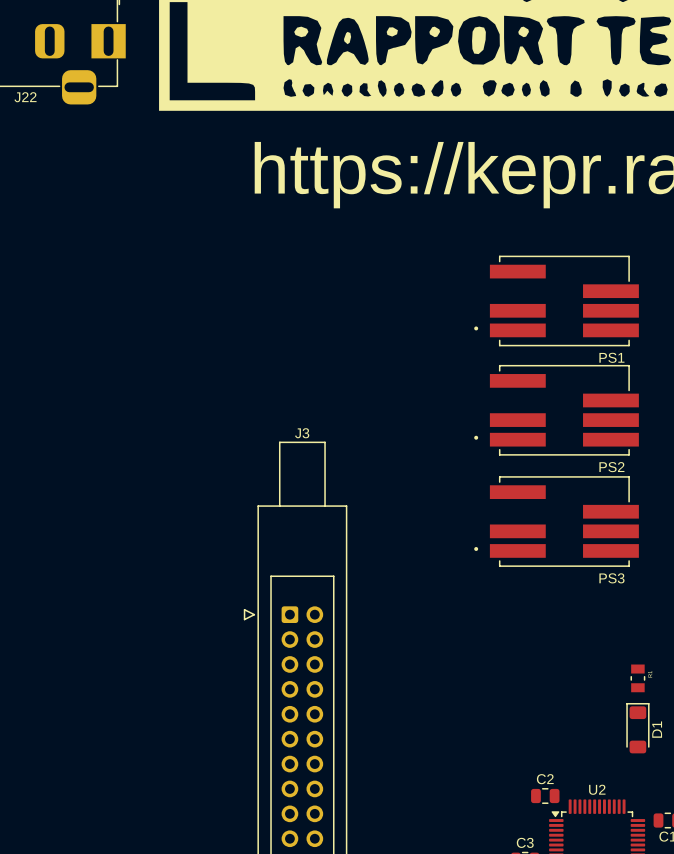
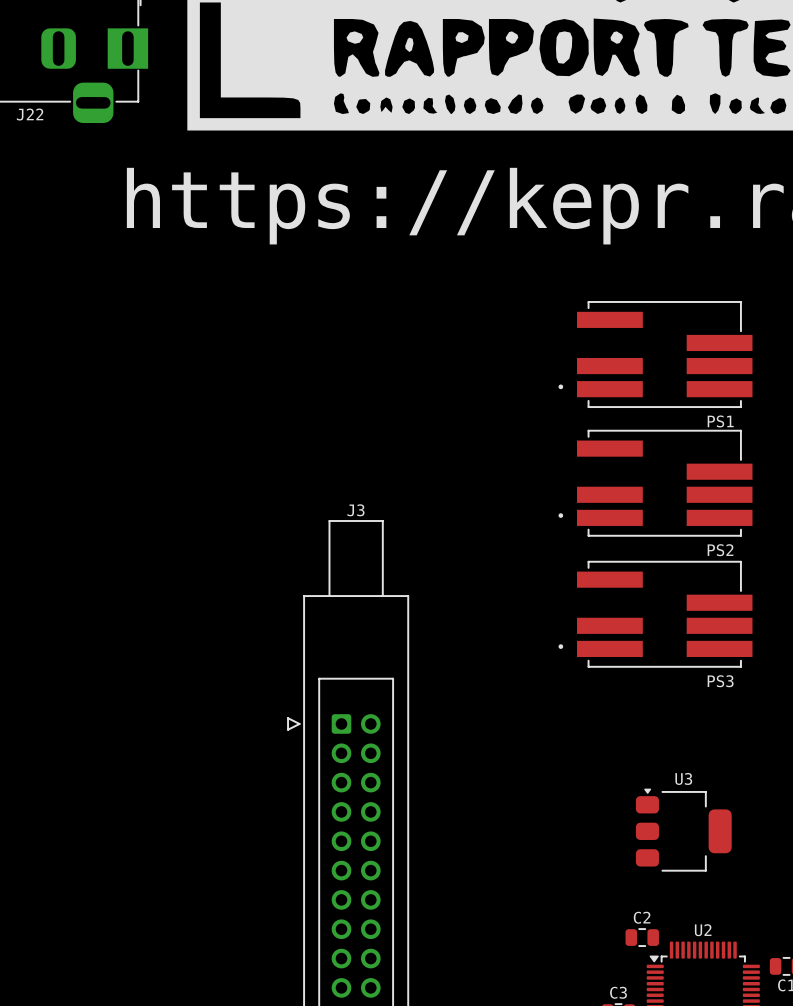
part: (637, 678) -> none
U3: none -> (683, 830)
D1: (637, 728) -> none

